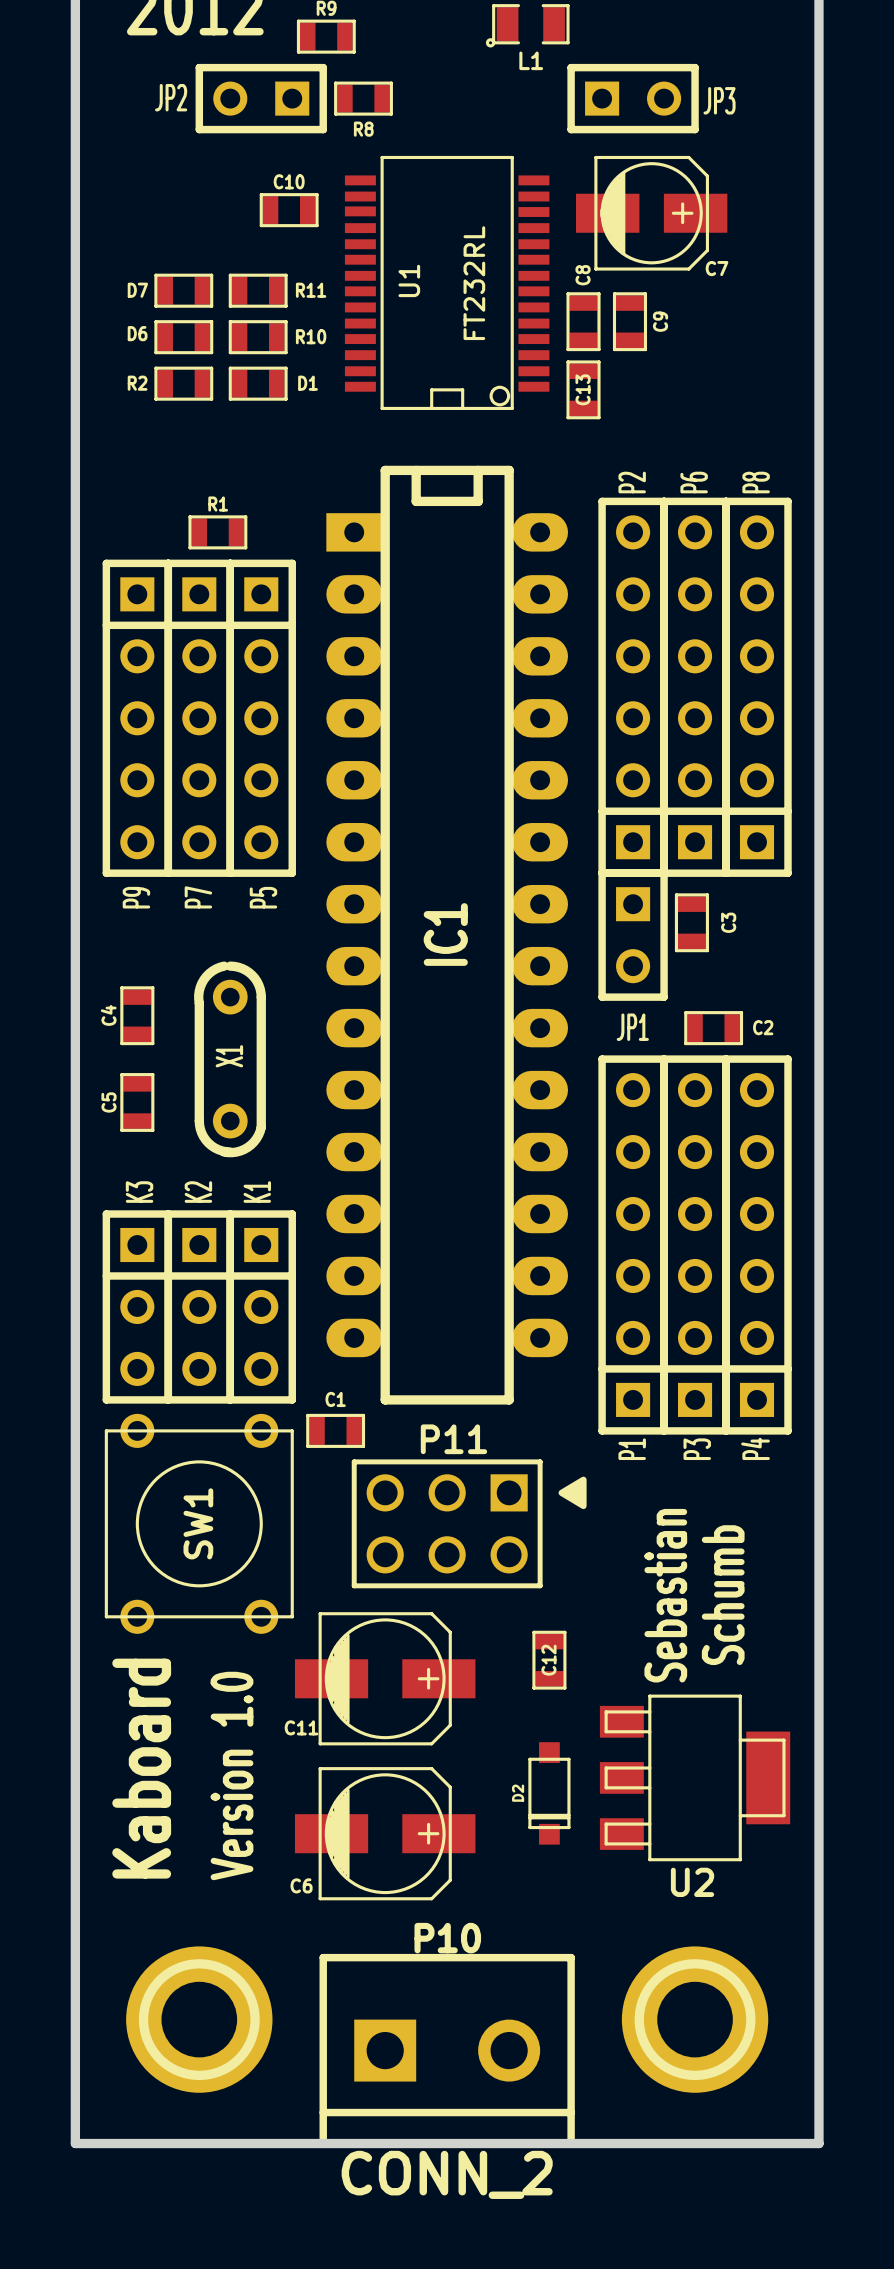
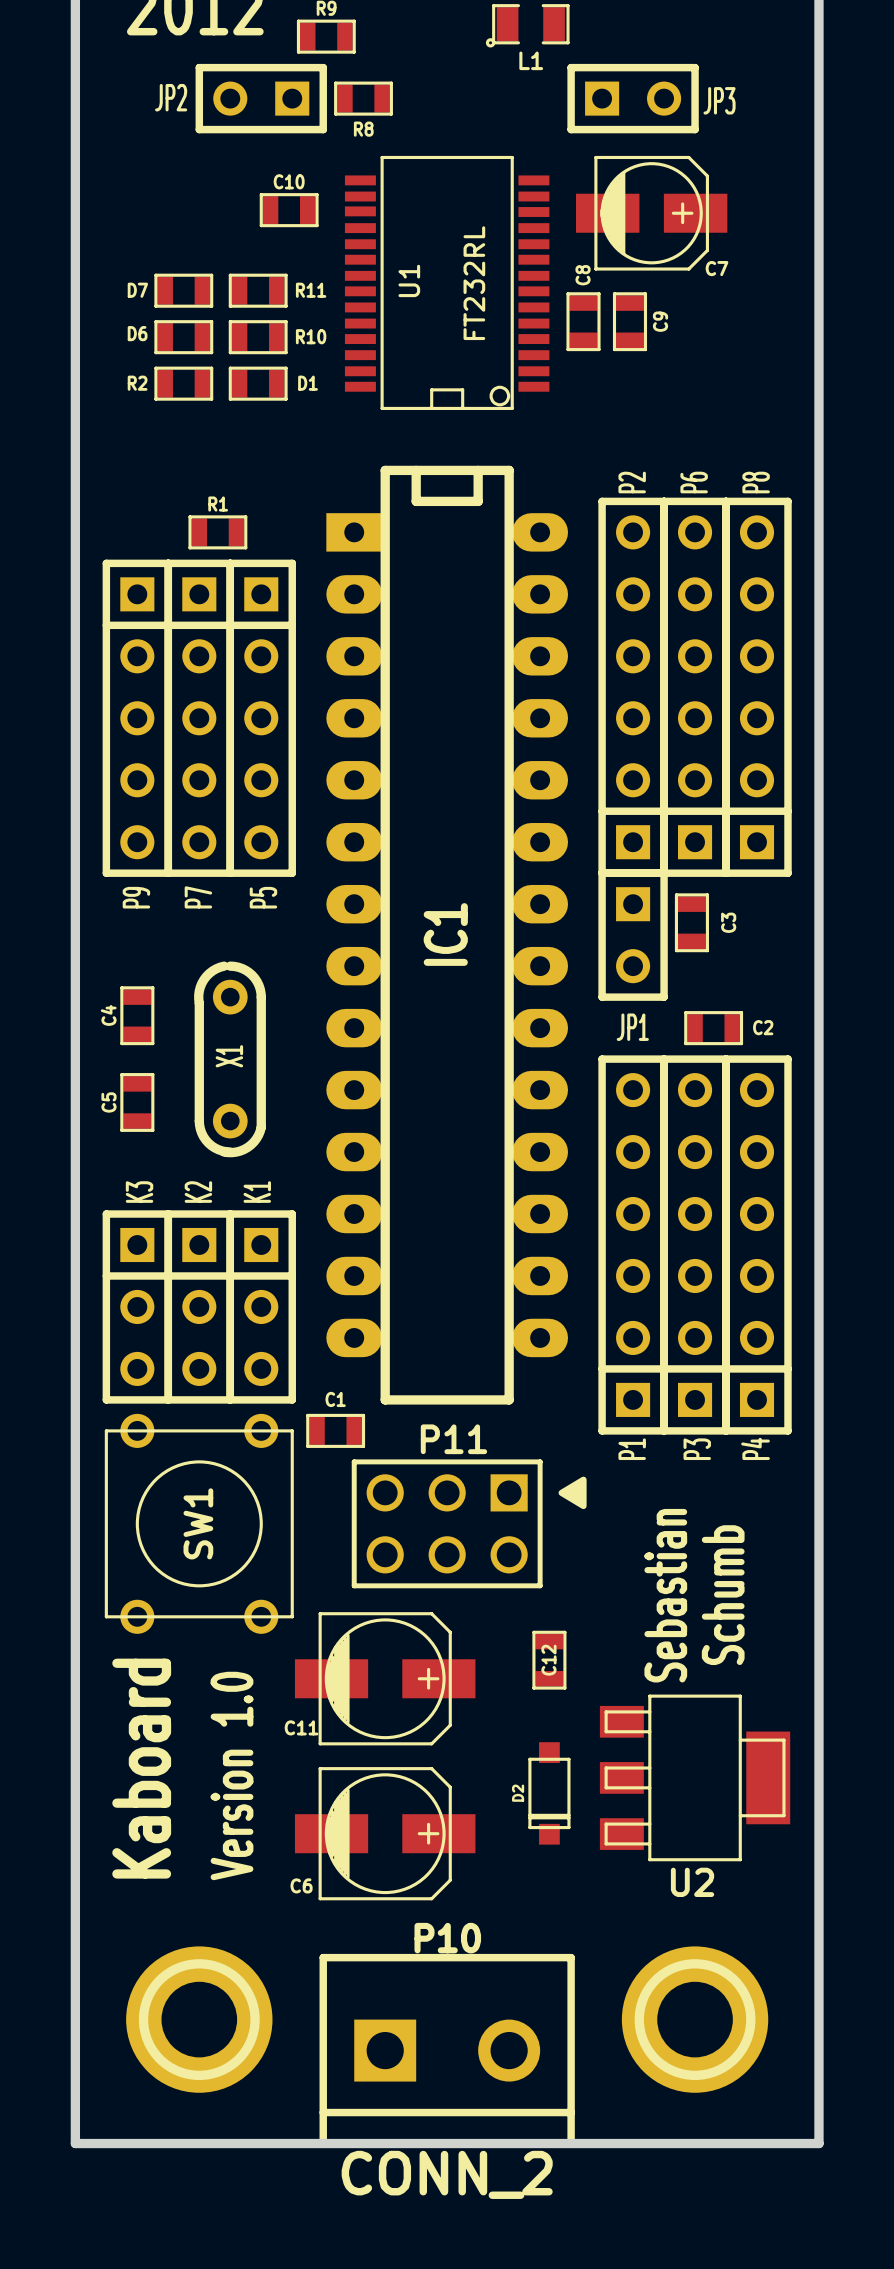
C13: (583, 389) -> none

